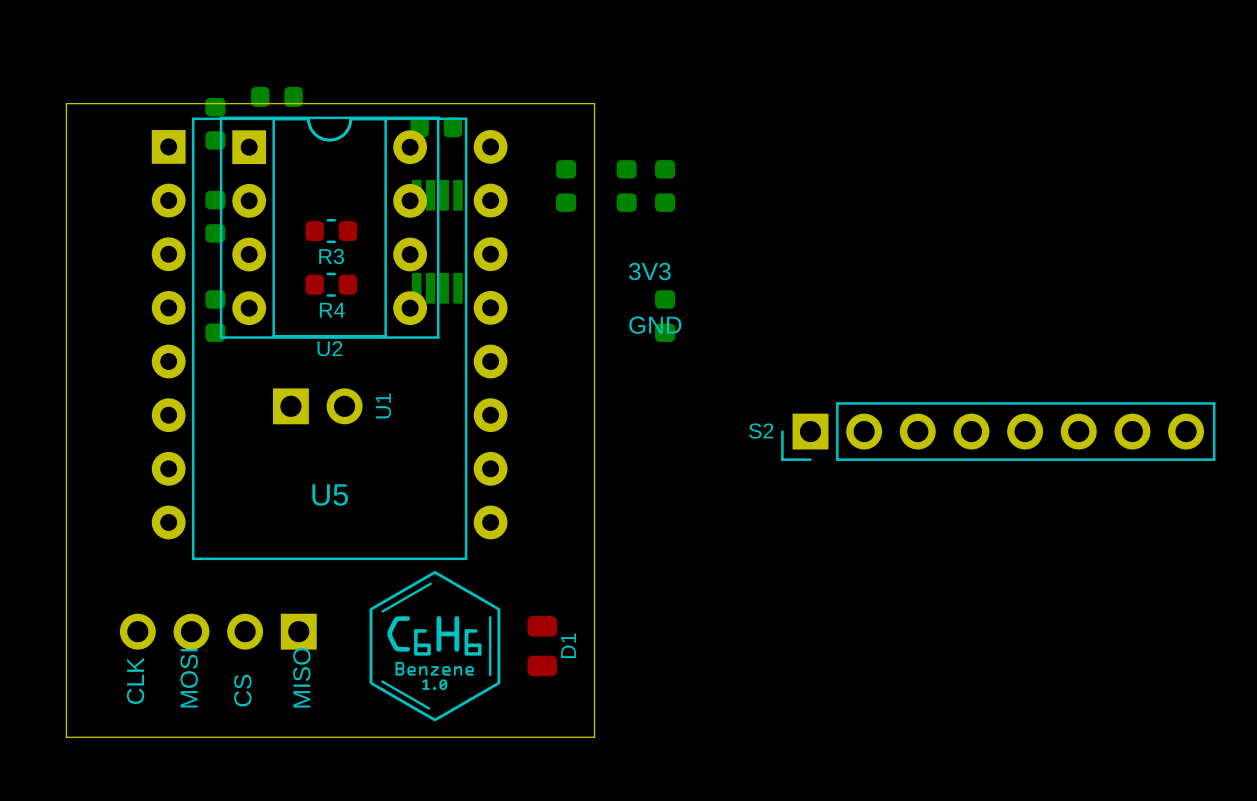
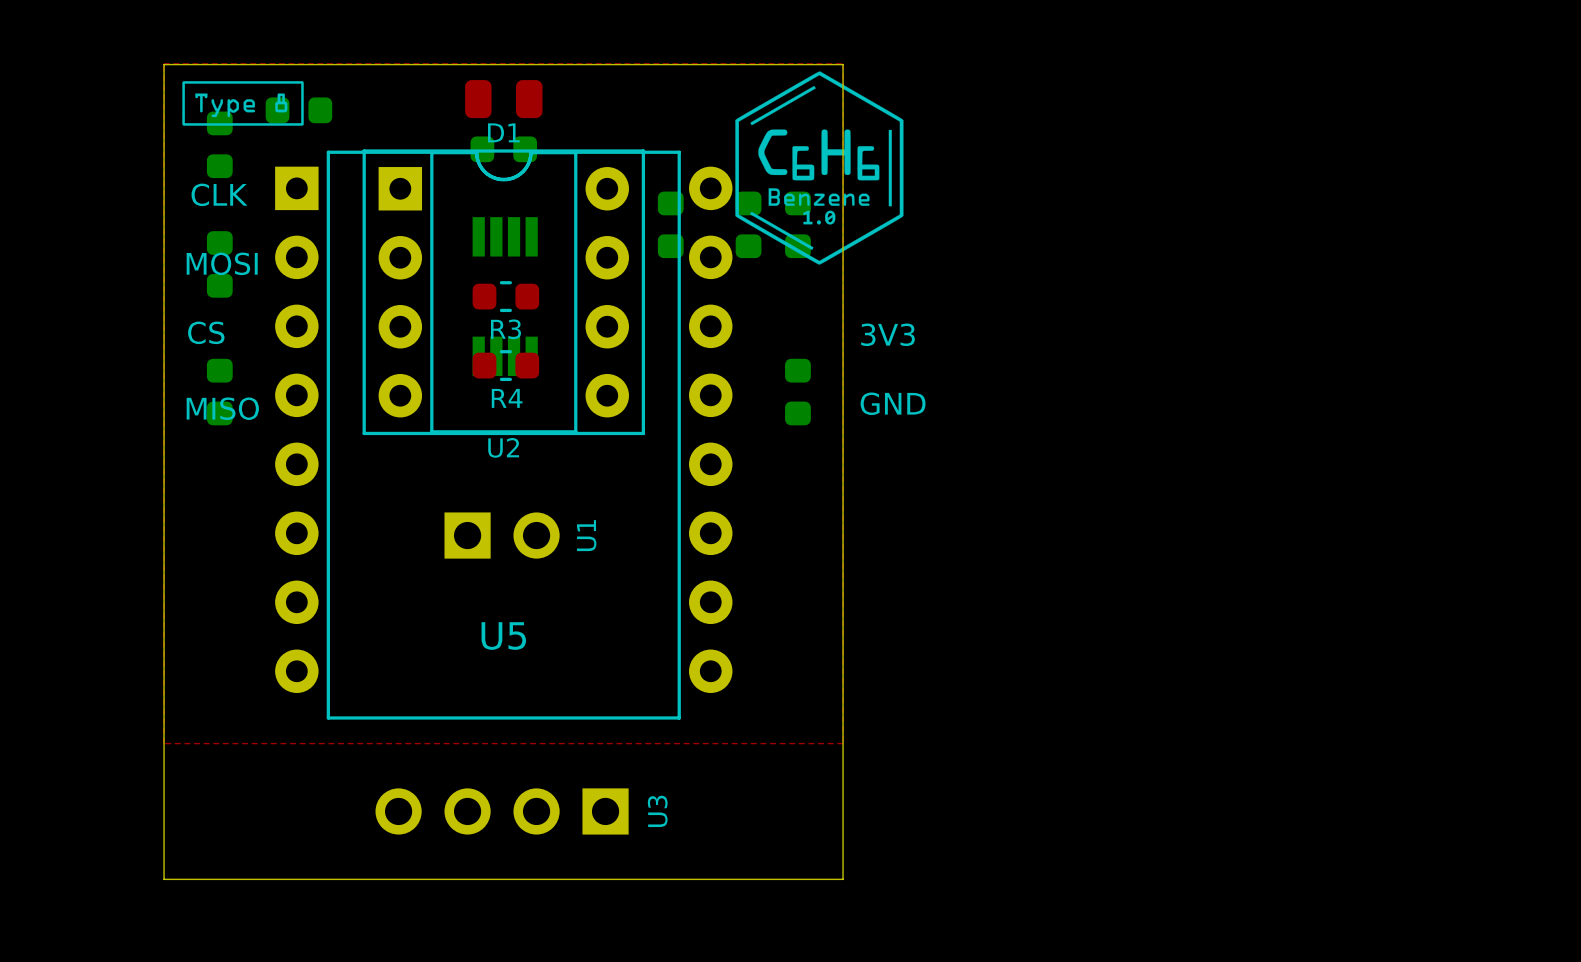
top zone outline: none -> (163, 63) (163, 743) (843, 743) (843, 63) (163, 63)
drawing: none -> [735, 71, 904, 265]
drawing: none -> [182, 81, 304, 126]
board edge: (66, 103) (66, 737) (594, 737) (594, 103) (66, 103) -> (164, 64) (164, 879) (843, 879) (843, 64) (164, 64)
U2 position: (329, 227) -> (503, 292)
R3 position: (331, 231) -> (505, 296)
text position: 3V3 (649, 271) -> 3V3 (888, 334)
R4 position: (331, 284) -> (505, 365)
text position: GND (655, 325) -> GND (893, 403)
U5 position: (329, 338) -> (503, 435)
U1 position: (317, 406) -> (502, 535)
S2: (998, 431) -> none
drawing: [369, 571, 501, 722] -> none
part: (218, 631) -> none
U3: none -> (502, 811)
D1 rotation: 0° (542, 646) -> 90° clockwise (503, 99)
D1 position: (542, 646) -> (503, 99)
text rotation: 0° (301, 677) -> 90° clockwise (222, 408)
text position: MISO (301, 677) -> MISO (222, 408)
text rotation: 0° (189, 678) -> 90° clockwise (222, 263)
text position: MOSI (189, 678) -> MOSI (222, 263)
text rotation: 0° (135, 680) -> 90° clockwise (219, 194)
text position: CLK (135, 680) -> CLK (219, 194)
text rotation: 0° (242, 690) -> 90° clockwise (206, 332)
text position: CS (242, 690) -> CS (206, 332)

